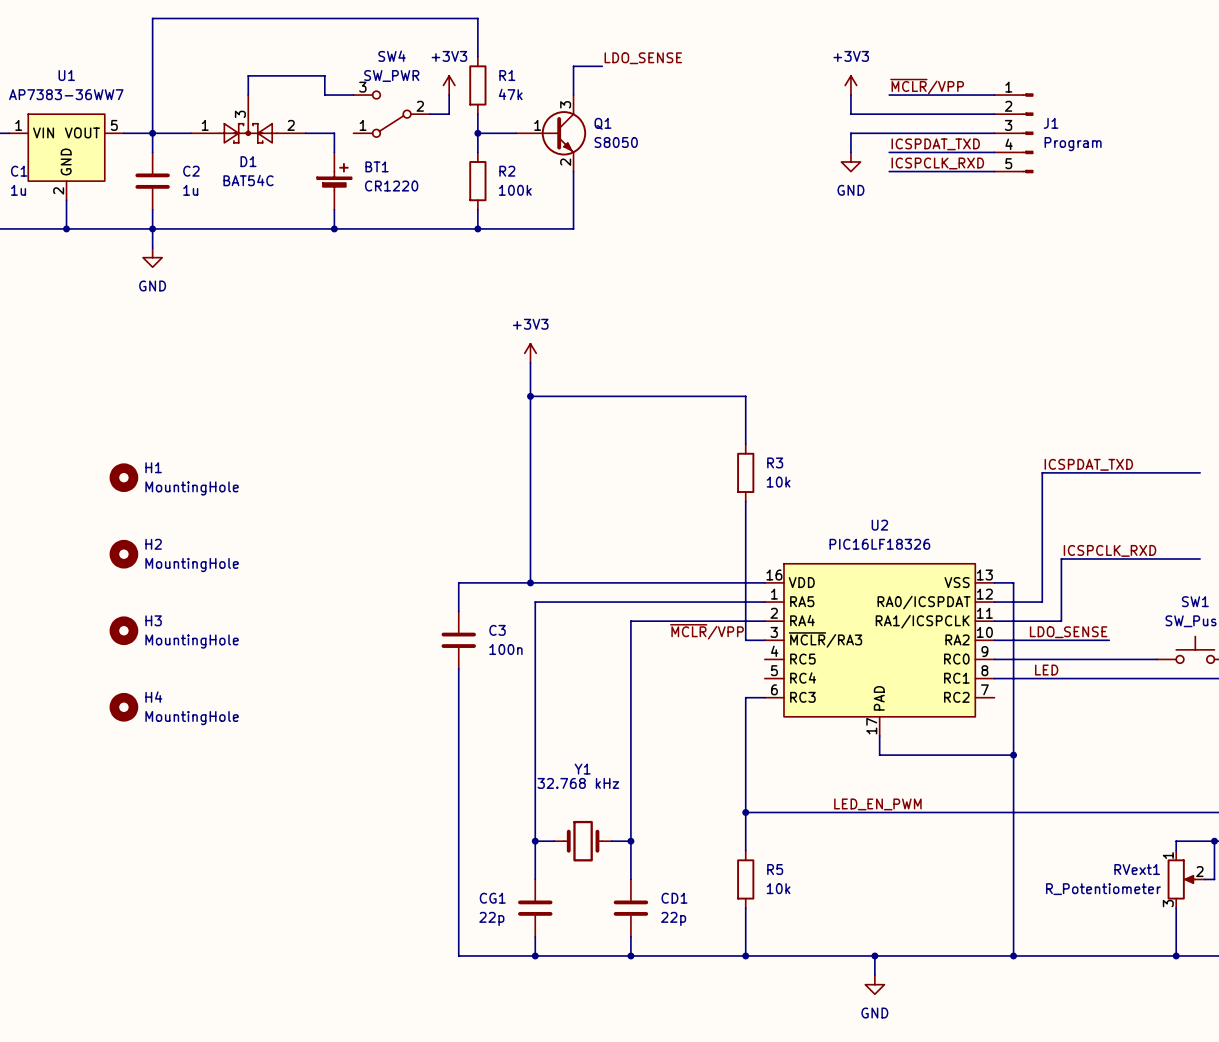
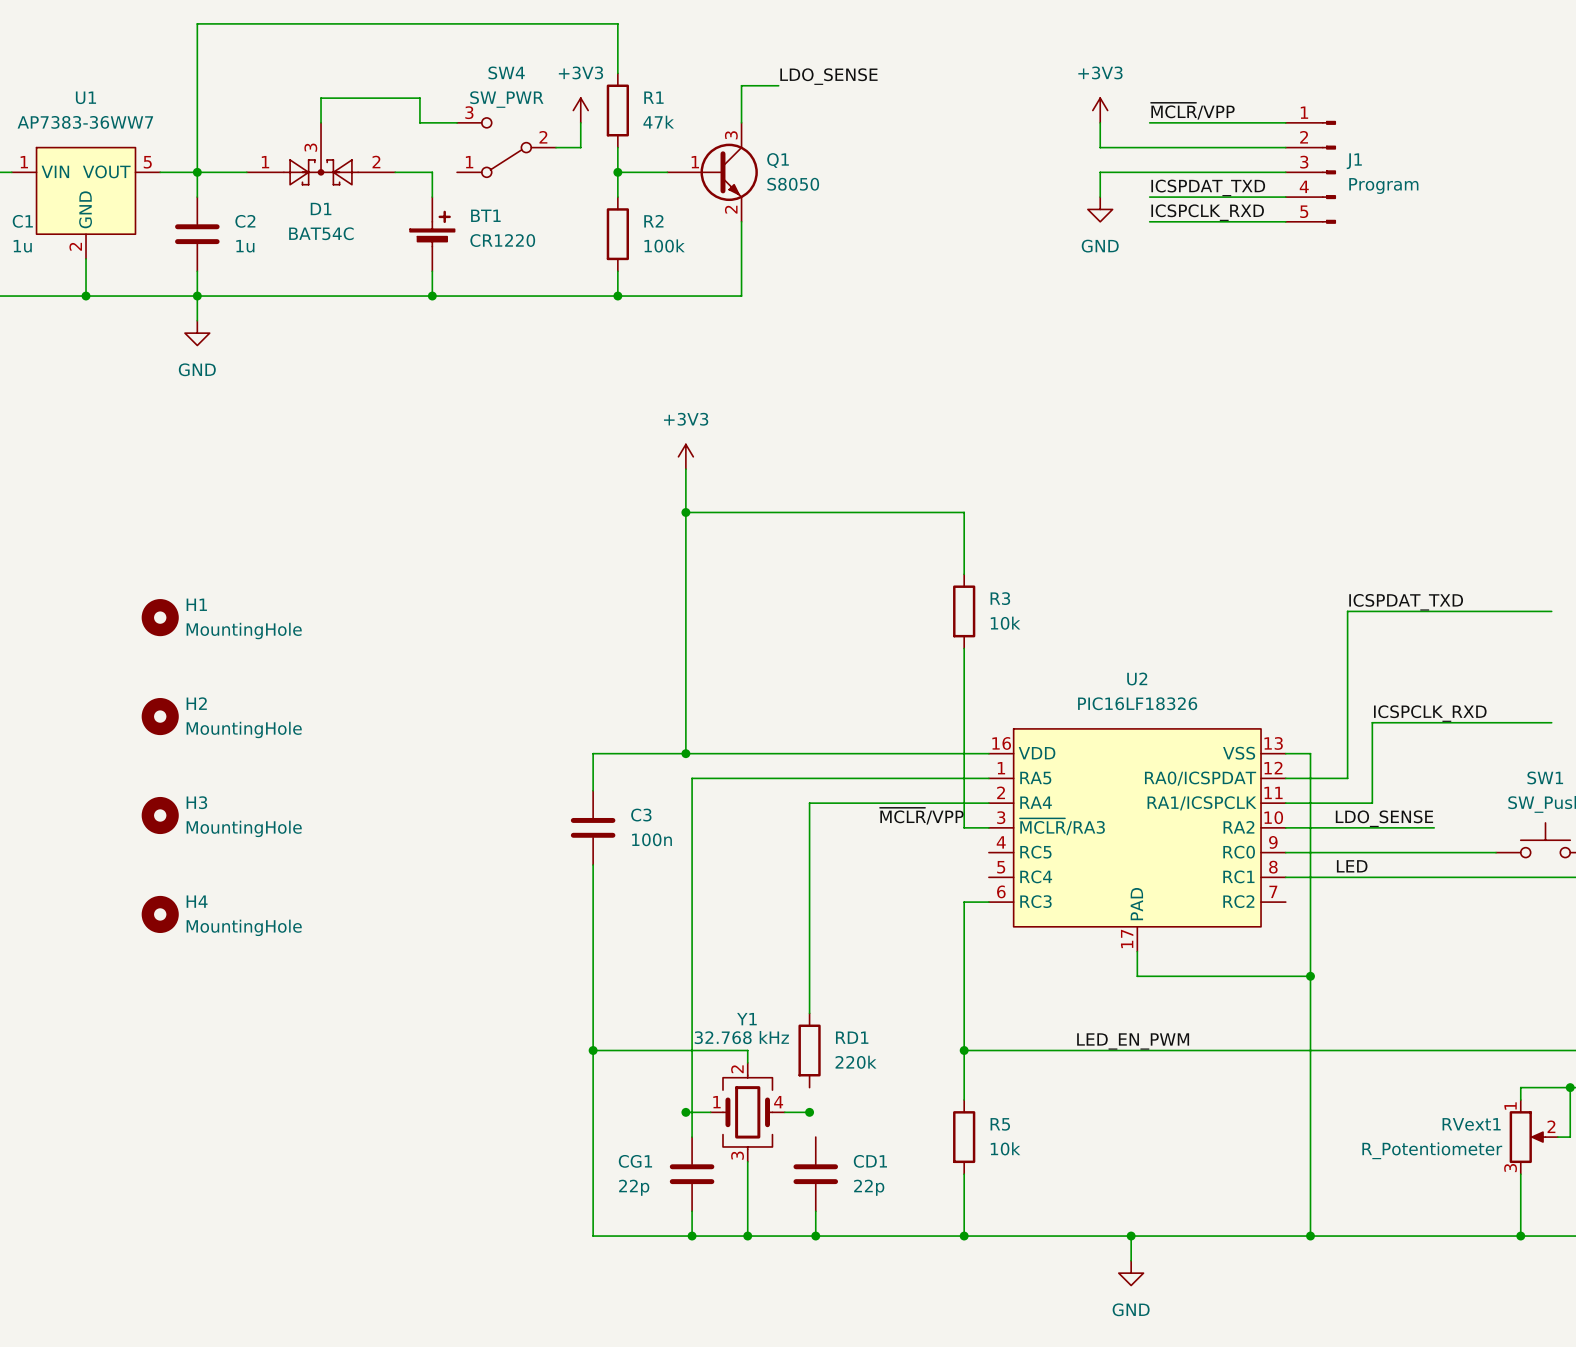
wire: (630, 621) (630, 879) -> (815, 803) (809, 803) (809, 1013)
wire: none -> (593, 1050) (747, 1050) (747, 1062)
junction: none -> (593, 1050)
RD1: none -> 220k (809, 1050)
Y1 symbol: [554, 820, 612, 862] -> [710, 1062, 785, 1162]
wire: (535, 841) (554, 841) -> (685, 1112) (710, 1112)
junction position: (535, 841) -> (685, 1112)
wire: (611, 841) (630, 841) -> (784, 1112) (809, 1112)
junction position: (630, 841) -> (809, 1112)
wire: none -> (747, 1161) (747, 1236)
junction: none -> (747, 1236)

